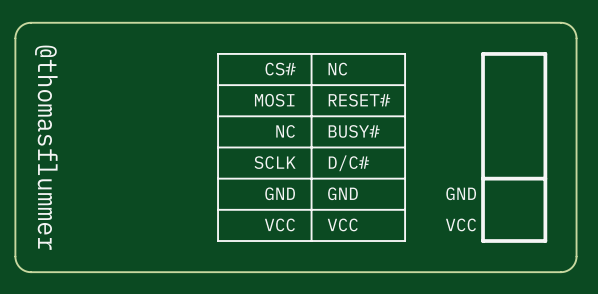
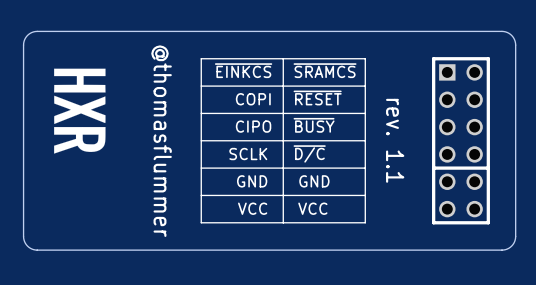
drawing: [481, 52, 548, 243] -> none
drawing: none -> [54, 68, 106, 154]
text: CS# (280, 69) -> ~{EINKCS} (243, 70)
text: NC (337, 69) -> ~{SRAMCS} (325, 70)
text: MOSI (274, 100) -> COPI (253, 99)
text: RESET# (359, 100) -> ~{RESET} (317, 98)
text: NC (285, 131) -> CIPO (253, 126)
text: BUSY# (354, 131) -> ~{BUSY} (314, 125)
text position: @thomasflummer (46, 147) -> @thomasflummer (161, 141)
text: none -> rev. 1.1 (395, 140)
part: none -> (460, 140)
text: D/C# (348, 163) -> ~{D/C} (309, 153)

